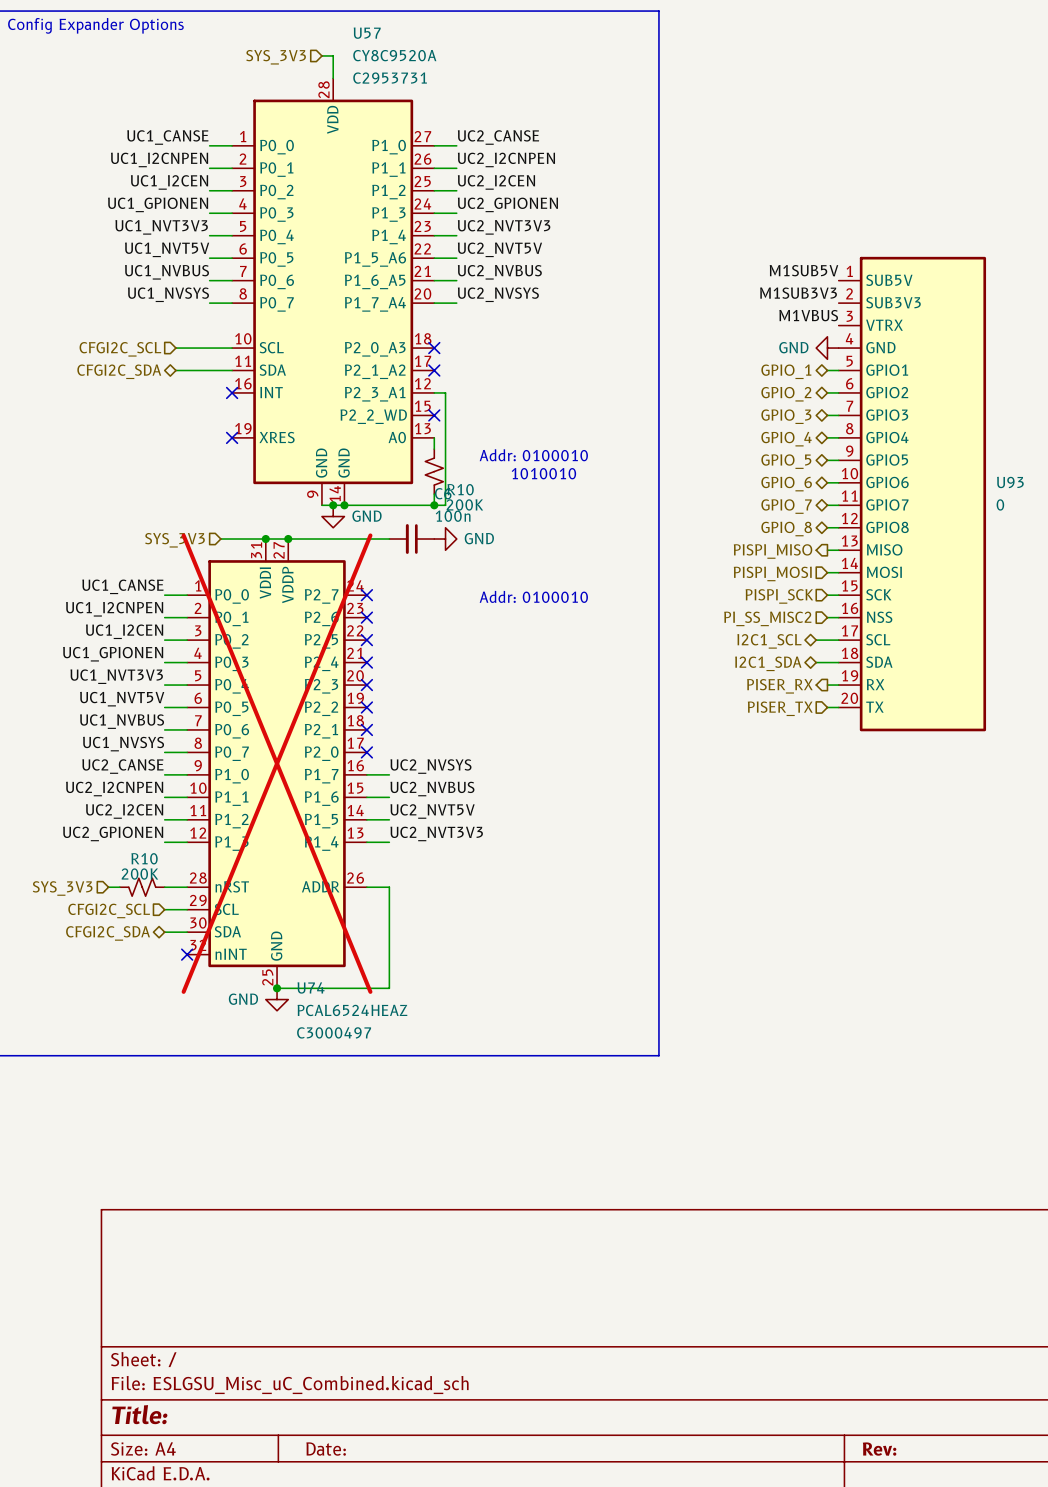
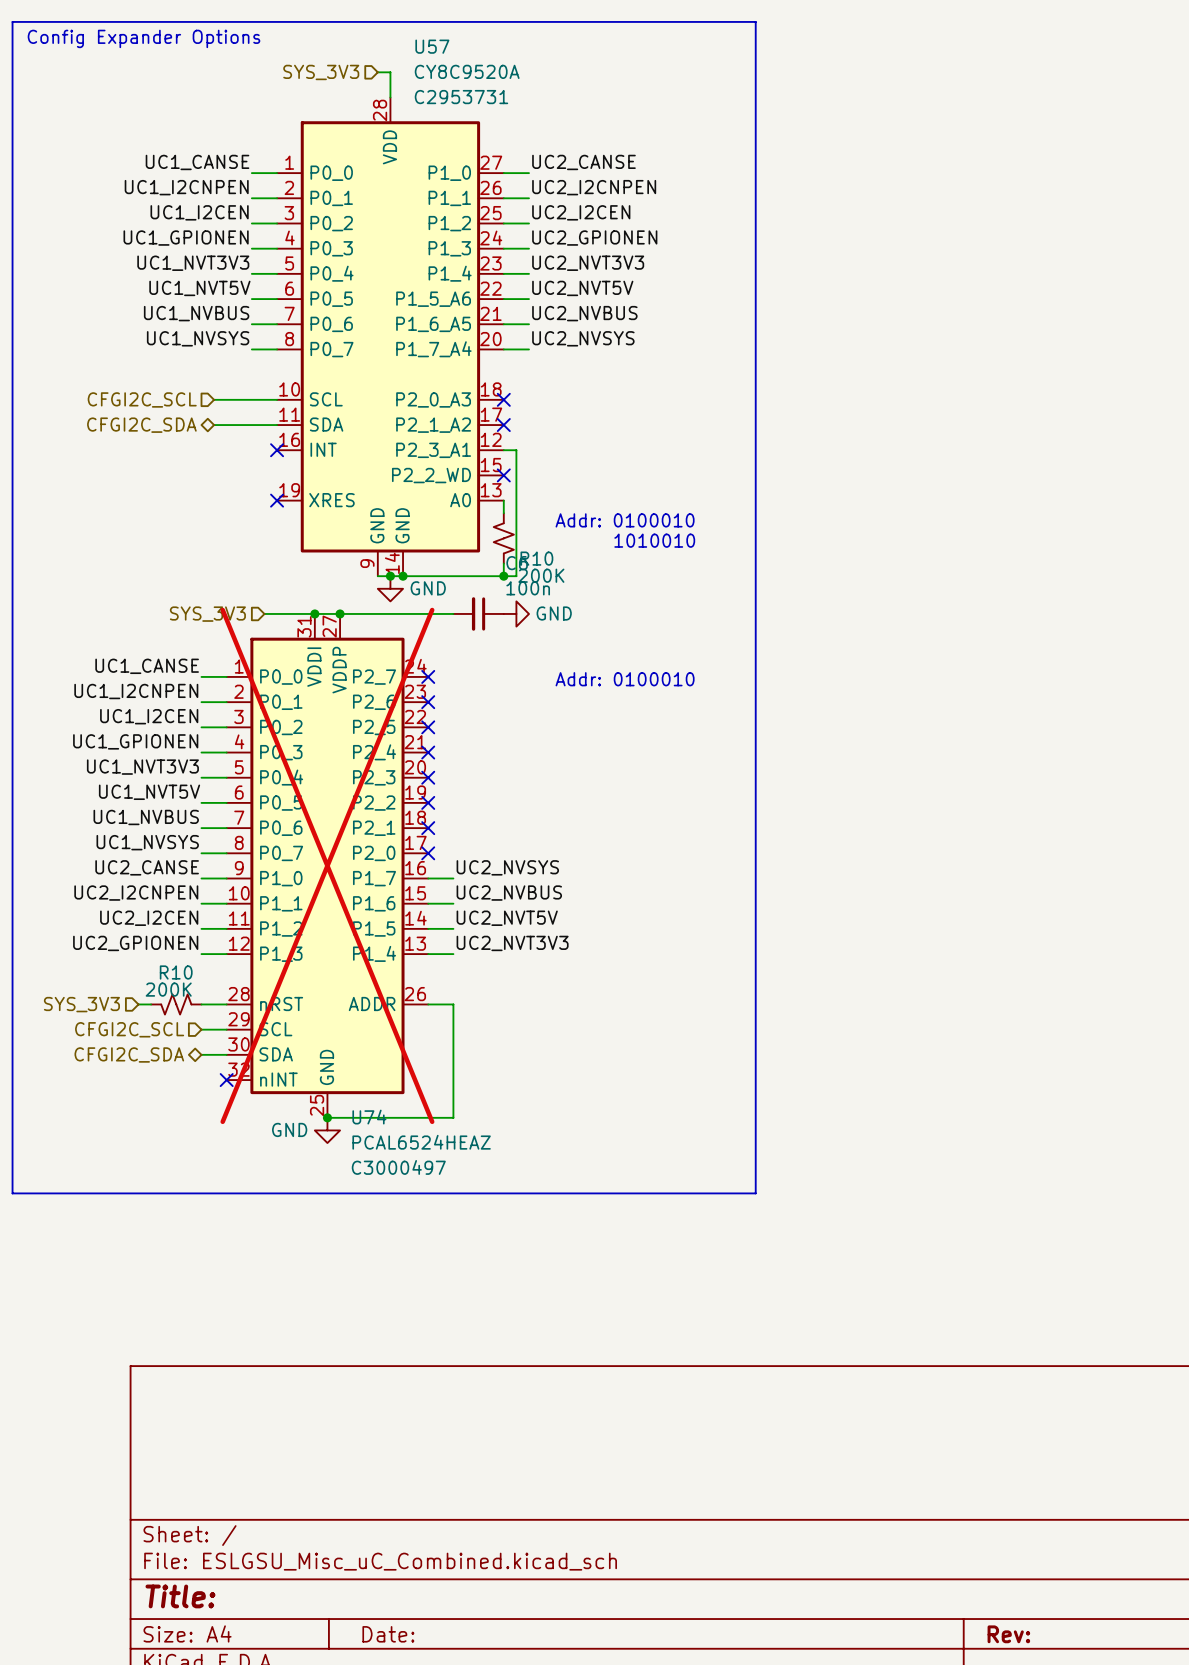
label: M1SUB5V (804, 270) -> none
label: M1SUB3V3 (798, 293) -> none
label: M1VBUS (808, 315) -> none
power symbol: GND (827, 348) -> none
wire: (827, 370) (838, 370) -> none
hierarchical label: GPIO_1 (786, 371) -> none
wire: (827, 392) (838, 392) -> none
hierarchical label: GPIO_2 (786, 394) -> none
wire: (827, 415) (838, 415) -> none
hierarchical label: GPIO_3 (786, 416) -> none
wire: (827, 437) (838, 437) -> none
hierarchical label: GPIO_4 (786, 439) -> none
wire: (827, 460) (838, 460) -> none
hierarchical label: GPIO_5 (786, 461) -> none
wire: (827, 482) (838, 482) -> none
hierarchical label: GPIO_6 (786, 484) -> none
U93: (912, 494) -> none
wire: (827, 505) (838, 505) -> none
hierarchical label: GPIO_7 (786, 506) -> none
wire: (827, 527) (838, 527) -> none
hierarchical label: GPIO_8 (786, 529) -> none
wire: (827, 550) (838, 550) -> none
hierarchical label: PISPI_MISO (773, 551) -> none
wire: (827, 572) (838, 572) -> none
hierarchical label: PISPI_MOSI (772, 573) -> none
wire: (827, 595) (838, 595) -> none
hierarchical label: PISPI_SCK (779, 596) -> none
wire: (827, 617) (838, 617) -> none
hierarchical label: PI_SS_MISC2 (767, 618) -> none
wire: (816, 640) (838, 640) -> none
hierarchical label: I2C1_SCL (769, 641) -> none
wire: (816, 662) (838, 662) -> none
hierarchical label: I2C1_SDA (768, 663) -> none
wire: (827, 685) (838, 685) -> none
hierarchical label: PISER_RX (779, 686) -> none
wire: (827, 707) (838, 707) -> none
hierarchical label: PISER_TX (780, 708) -> none

